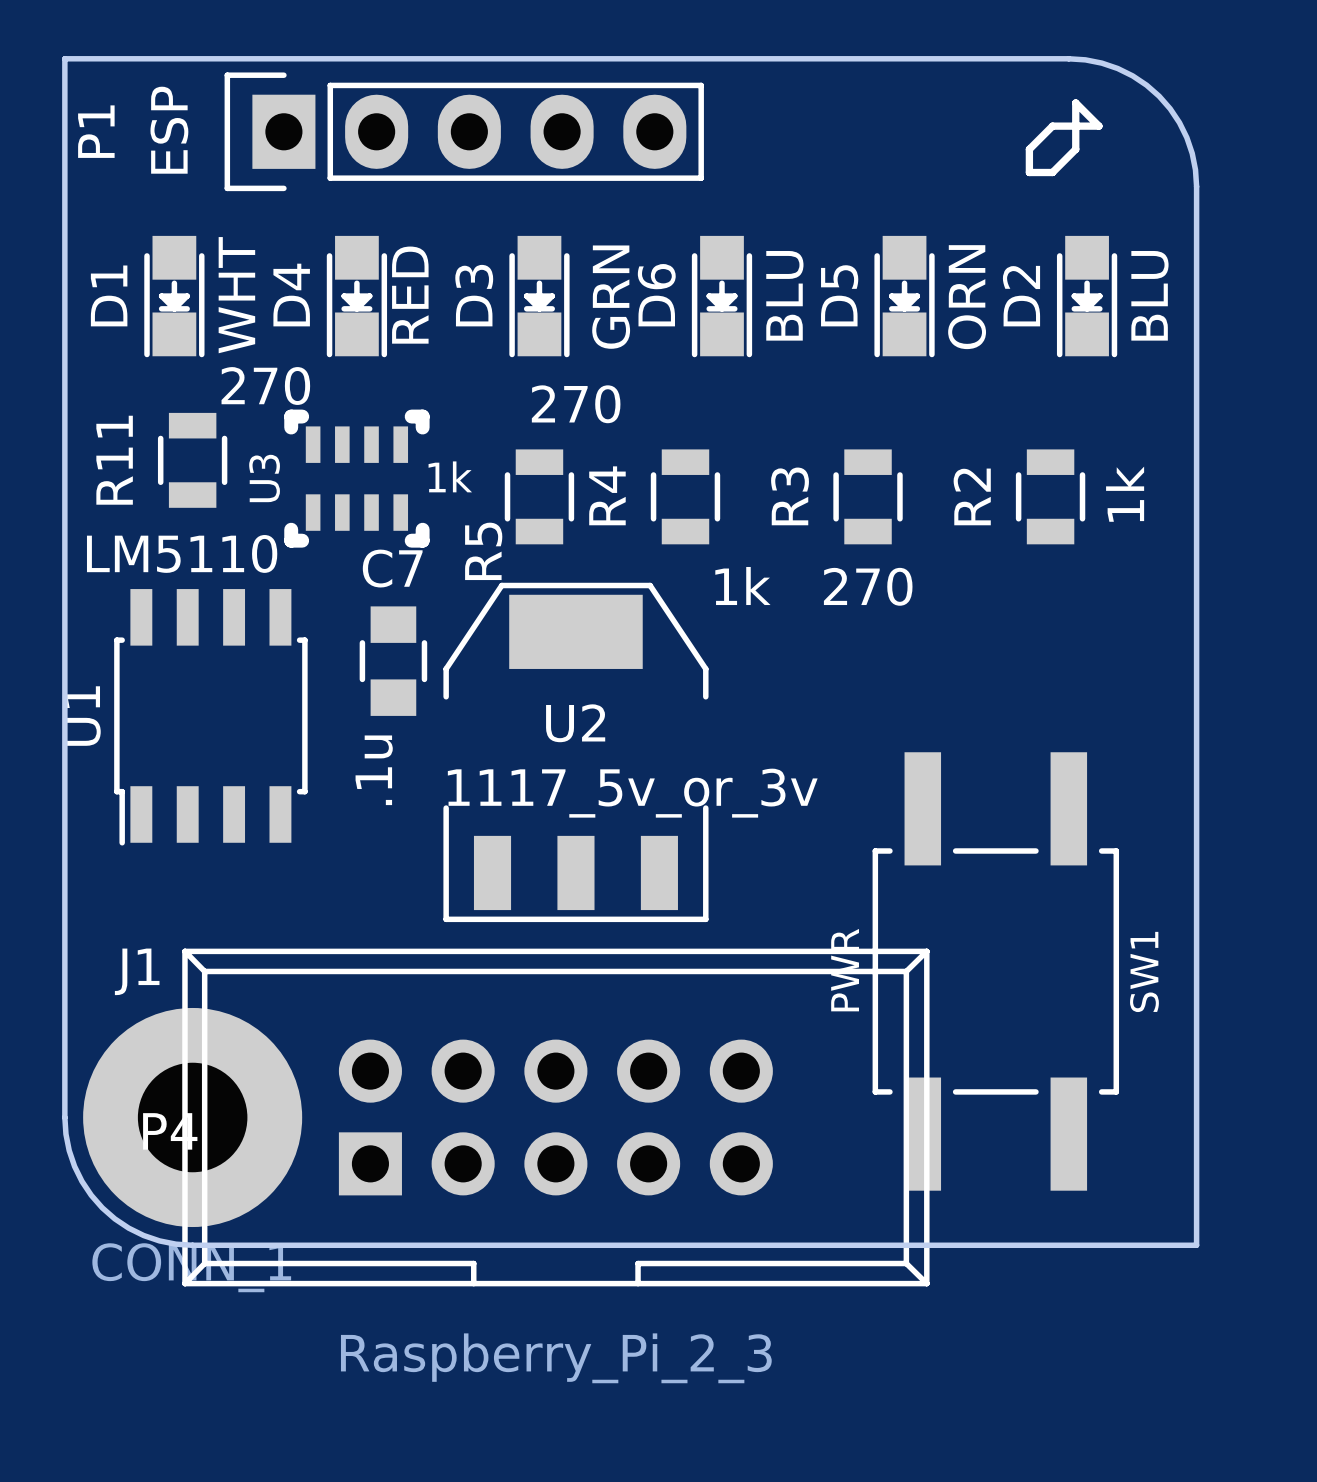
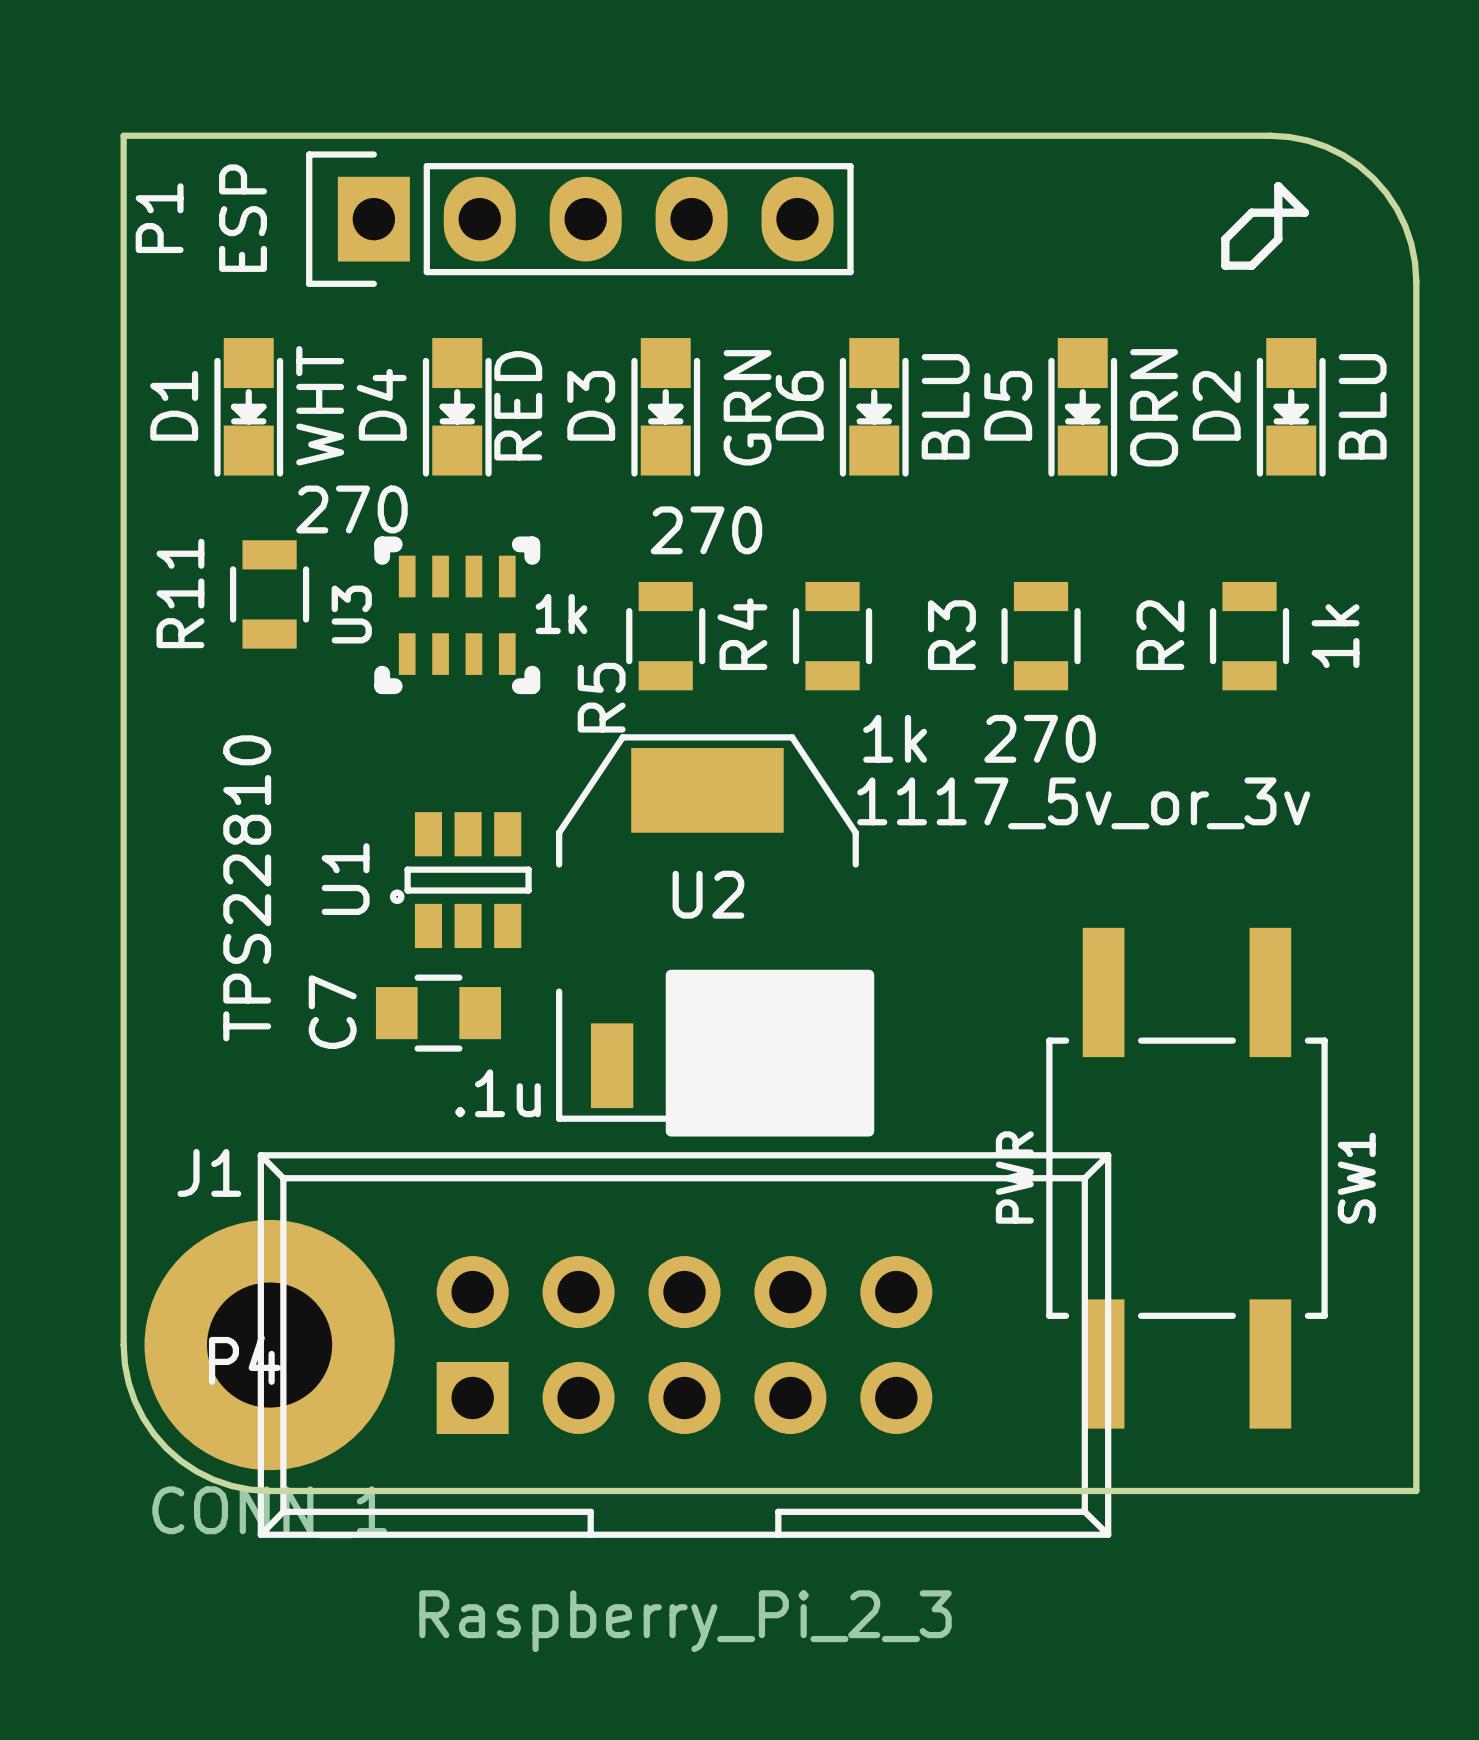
U1 value: LM5110 (182, 553) -> TPS22810 (247, 888)
C7 name position: C7 (392, 568) -> C7 (332, 1012)
U1 footprint: [114, 589, 308, 846] -> [389, 812, 532, 949]
C7 rotation: 0° (393, 661) -> 90° clockwise (438, 1013)
C7 position: (393, 661) -> (438, 1013)
C7 value position: .1u (374, 770) -> .1u (497, 1093)
drawing: none -> [665, 969, 875, 1137]
U2 value position: 1117_5v_or_3v (632, 793) -> 1117_5v_or_3v (1083, 803)

